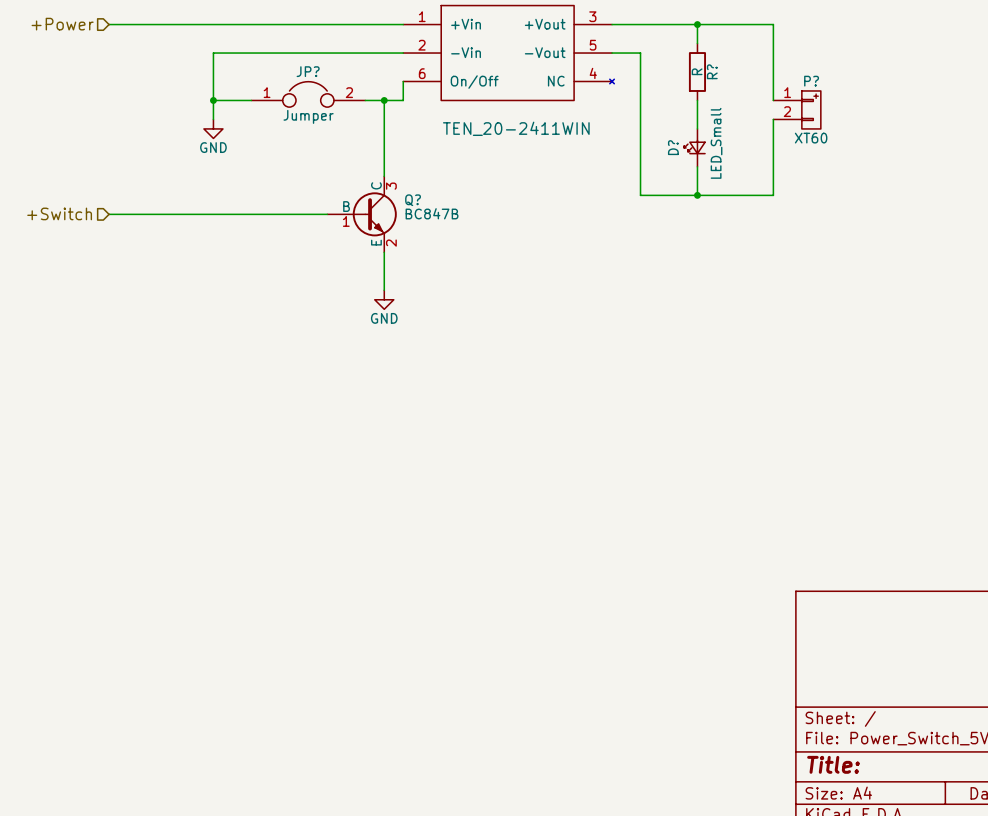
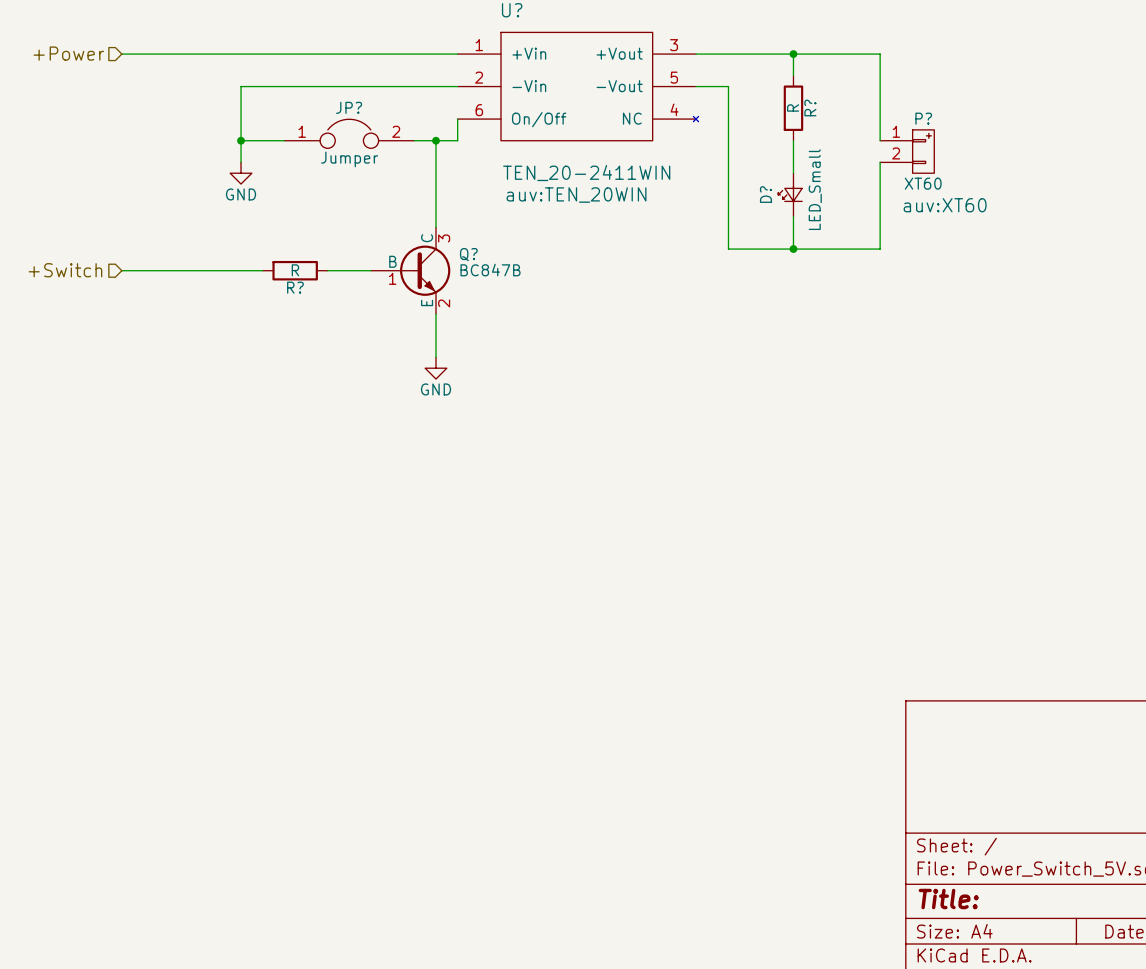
U? text: none -> auv:TEN_20WIN (576, 195)
P? text: none -> auv:XT60 (945, 205)
wire: (232, 214) (289, 214) -> none
R?: none -> R (295, 270)

